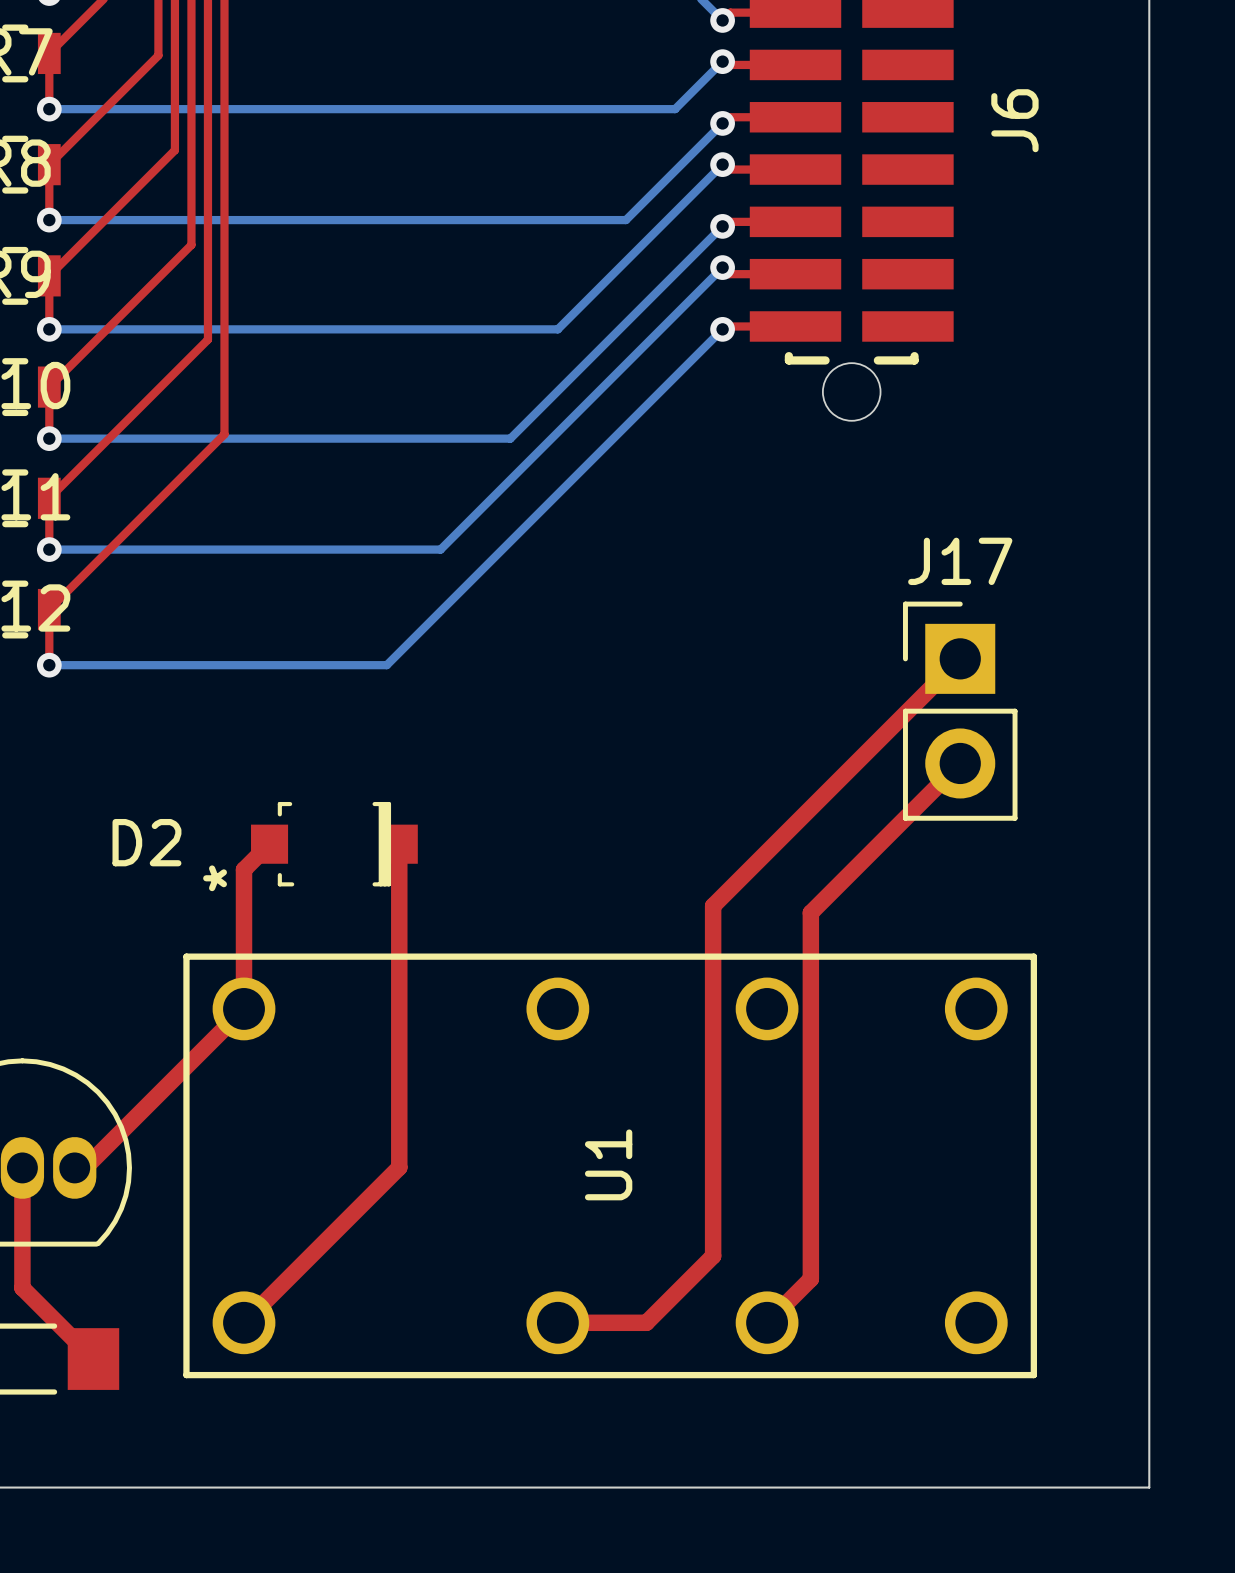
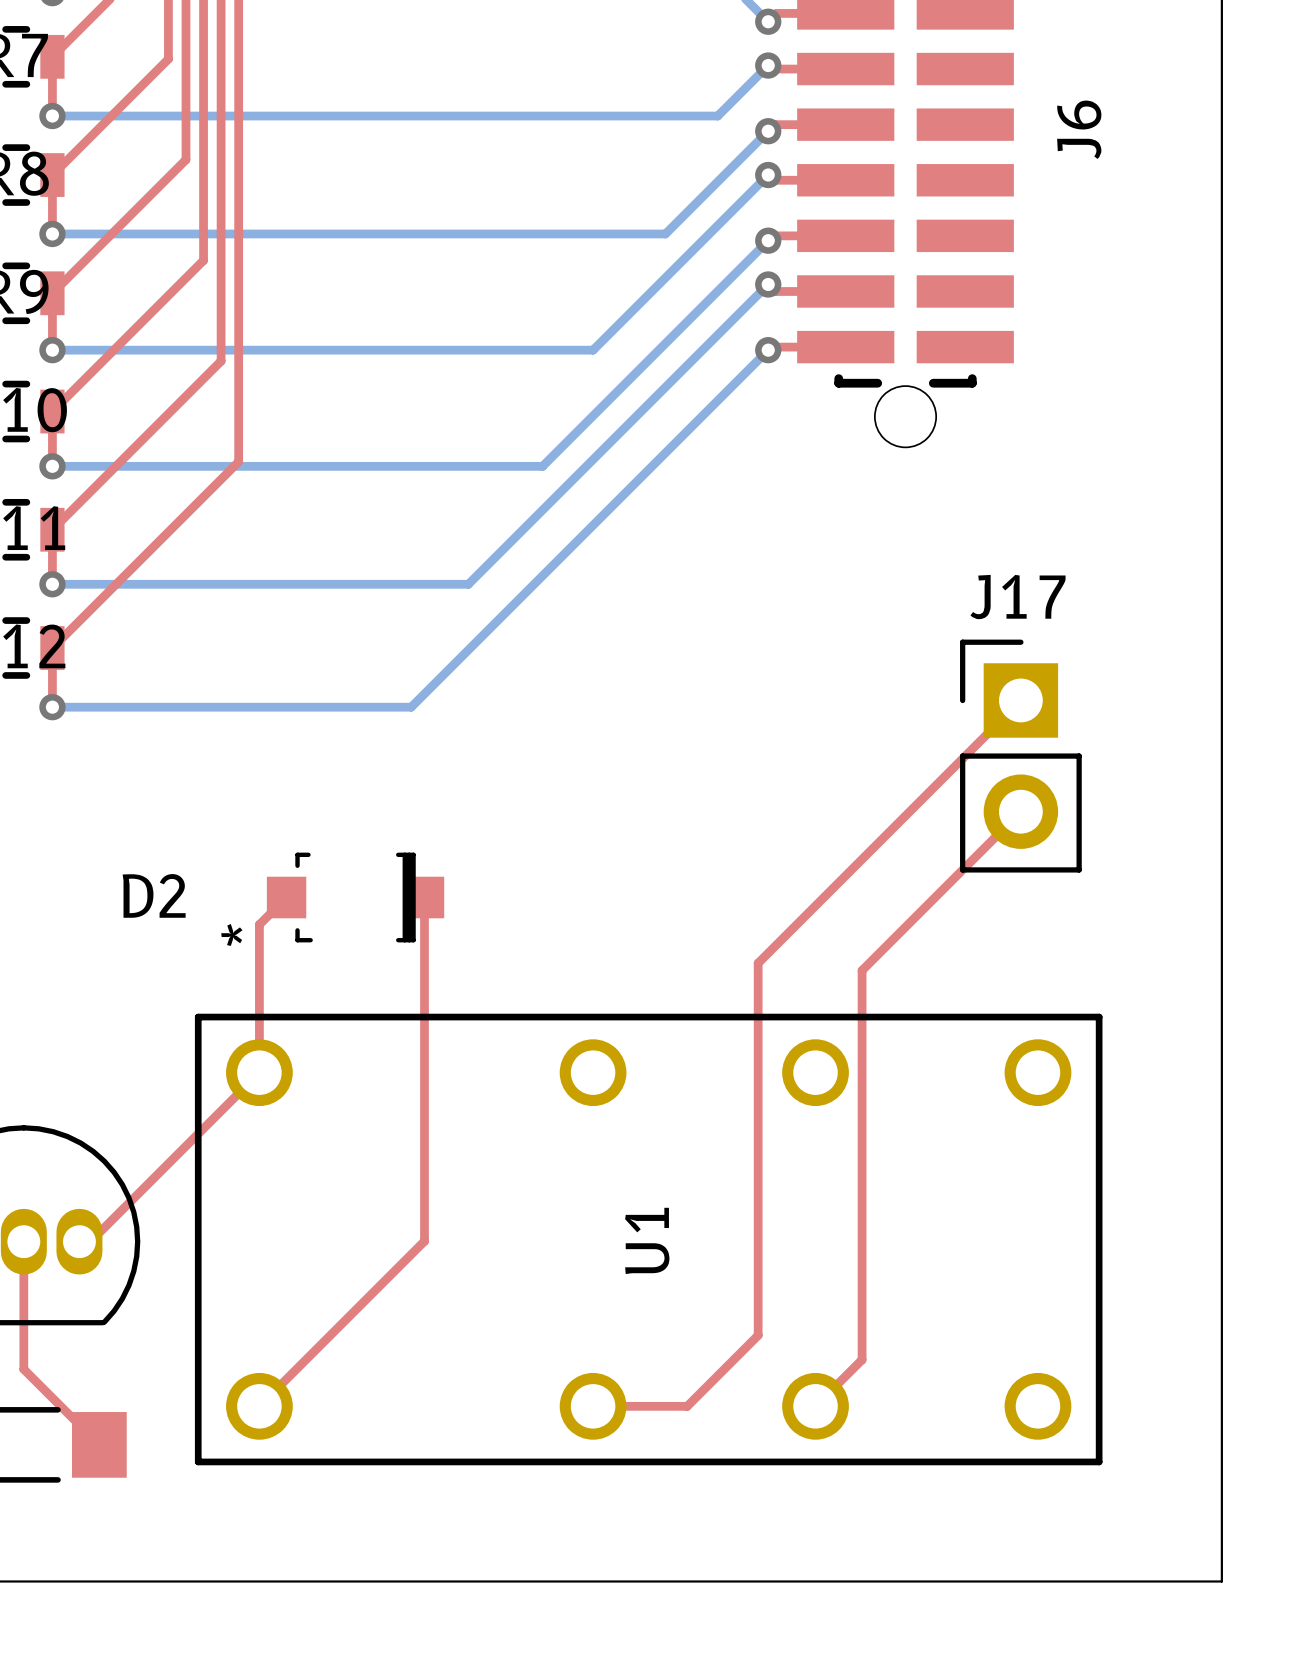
top track width: thick (960, 658) (713, 905) (713, 1256) (646, 1322) (557, 1322) -> thin (1020, 700) (758, 963) (758, 1335) (687, 1406) (593, 1406)
top track width: thick (960, 763) (810, 912) (810, 1279) (767, 1322) -> thin (1020, 811) (862, 970) (862, 1359) (815, 1406)
top track width: thick (269, 844) (244, 869) (244, 1008) (85, 1167) -> thin (286, 897) (259, 924) (259, 1072) (90, 1241)
top track width: thick (399, 844) (399, 1167) (244, 1322) -> thin (424, 897) (424, 1241) (259, 1406)
top track width: thick (22, 1167) (22, 1287) (93, 1359) -> thin (23, 1241) (23, 1369) (99, 1444)

